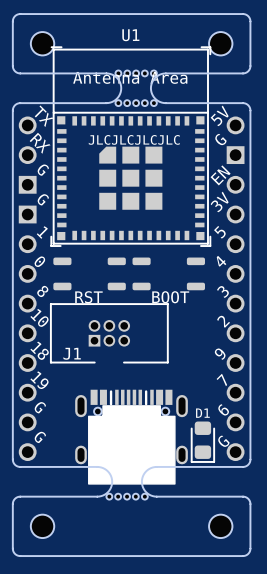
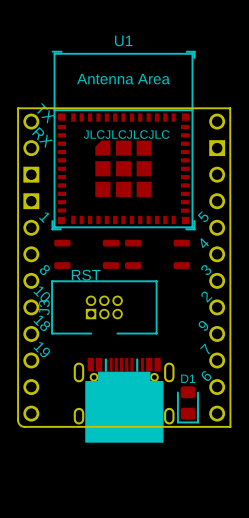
part: (42, 43) -> none
part: (220, 43) -> none
board edge: (106, 73) (16, 72) (12, 66) (13, 17) (20, 14) (243, 14) (249, 17) (250, 66) (246, 72) (165, 73) -> none
part: (136, 88) -> none
board edge: (106, 103) (19, 103) (14, 105) (12, 110) -> none
board edge: (165, 103) (243, 103) (250, 108) (250, 459) (248, 464) (243, 466) -> (18, 108) (230, 108) (230, 426) (223, 426)
text: 5V (219, 115) -> none
text: G (220, 139) -> none
text: G (43, 170) -> none
text: EN (220, 175) -> none
text: G (43, 199) -> none
text: 3V (219, 201) -> none
text: 0 (39, 261) -> none
text: BOOT (170, 297) -> none
J1 name: J1 (72, 353) -> J3 (44, 307)
text: G (40, 407) -> none
text: G (40, 437) -> none
text: G (223, 441) -> none
board edge: none -> (93, 426) (146, 426)
part: (127, 481) -> none
board edge: (97, 496) (16, 497) (12, 504) (13, 552) (20, 556) (243, 556) (249, 552) (250, 504) (246, 497) (156, 496) -> none
part: (42, 526) -> none
part: (220, 526) -> none

